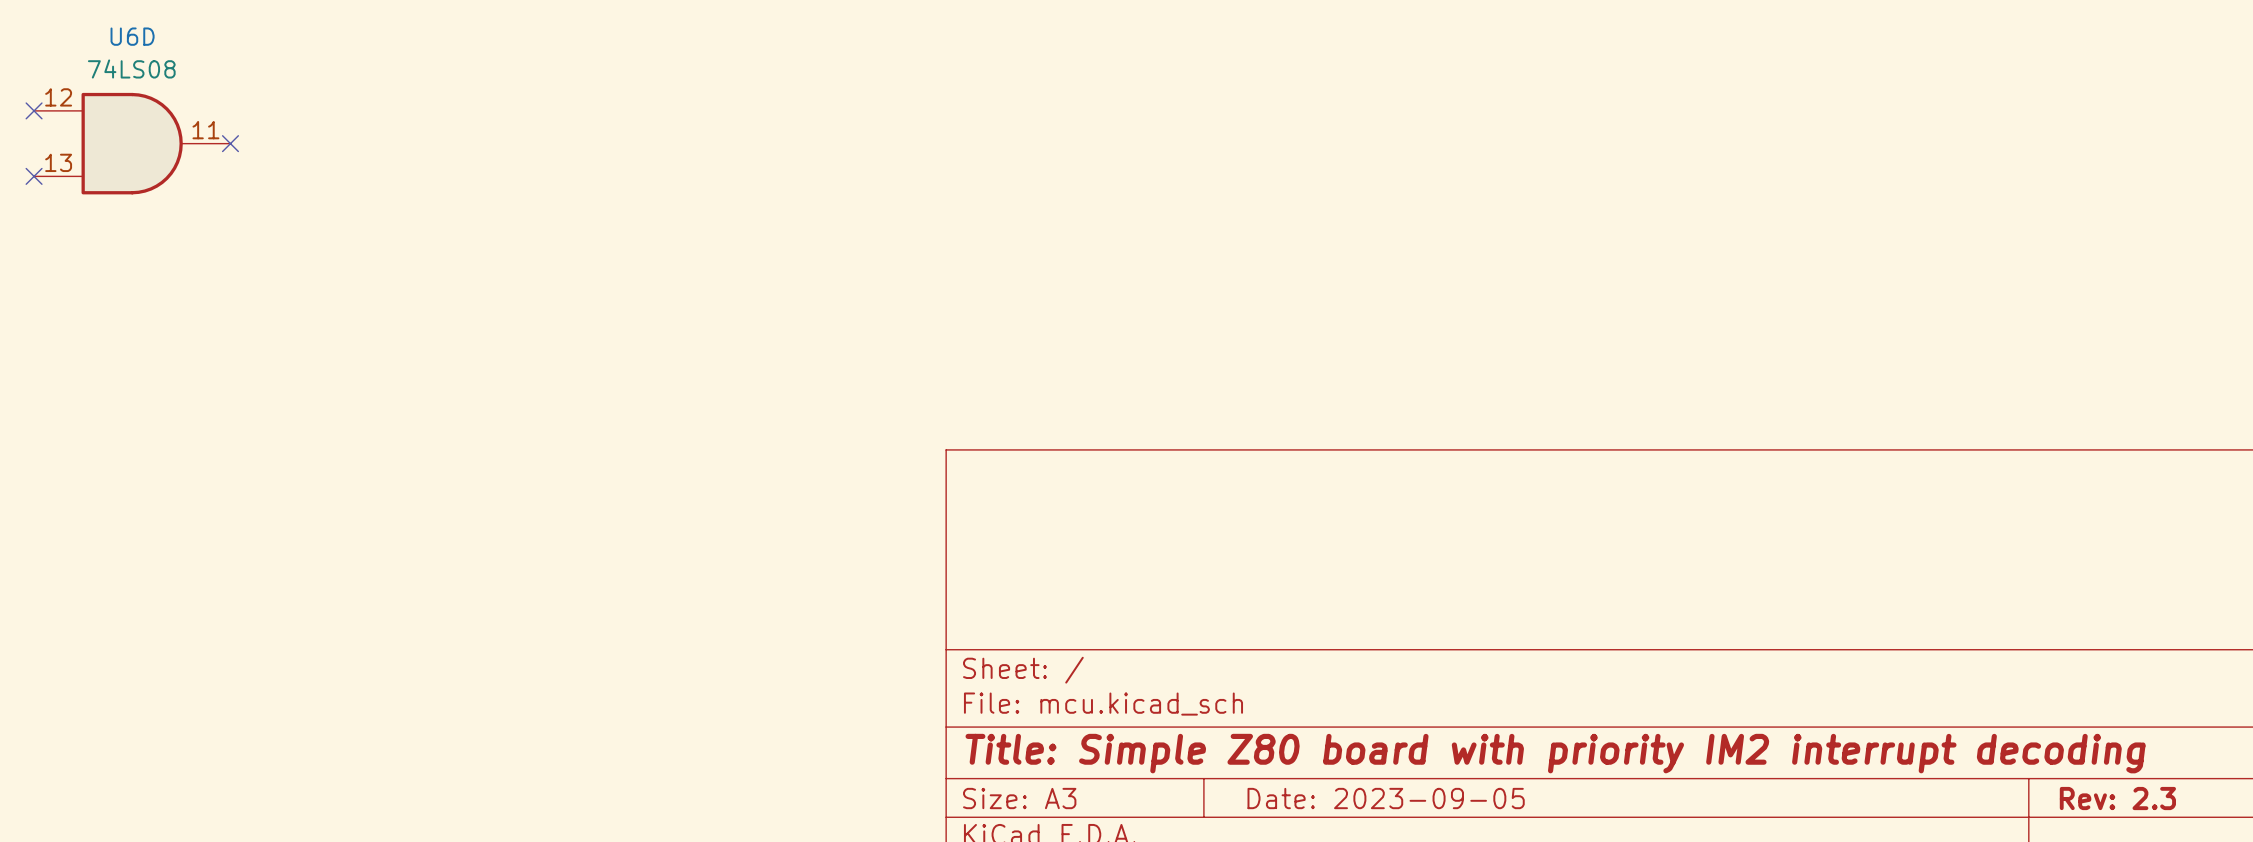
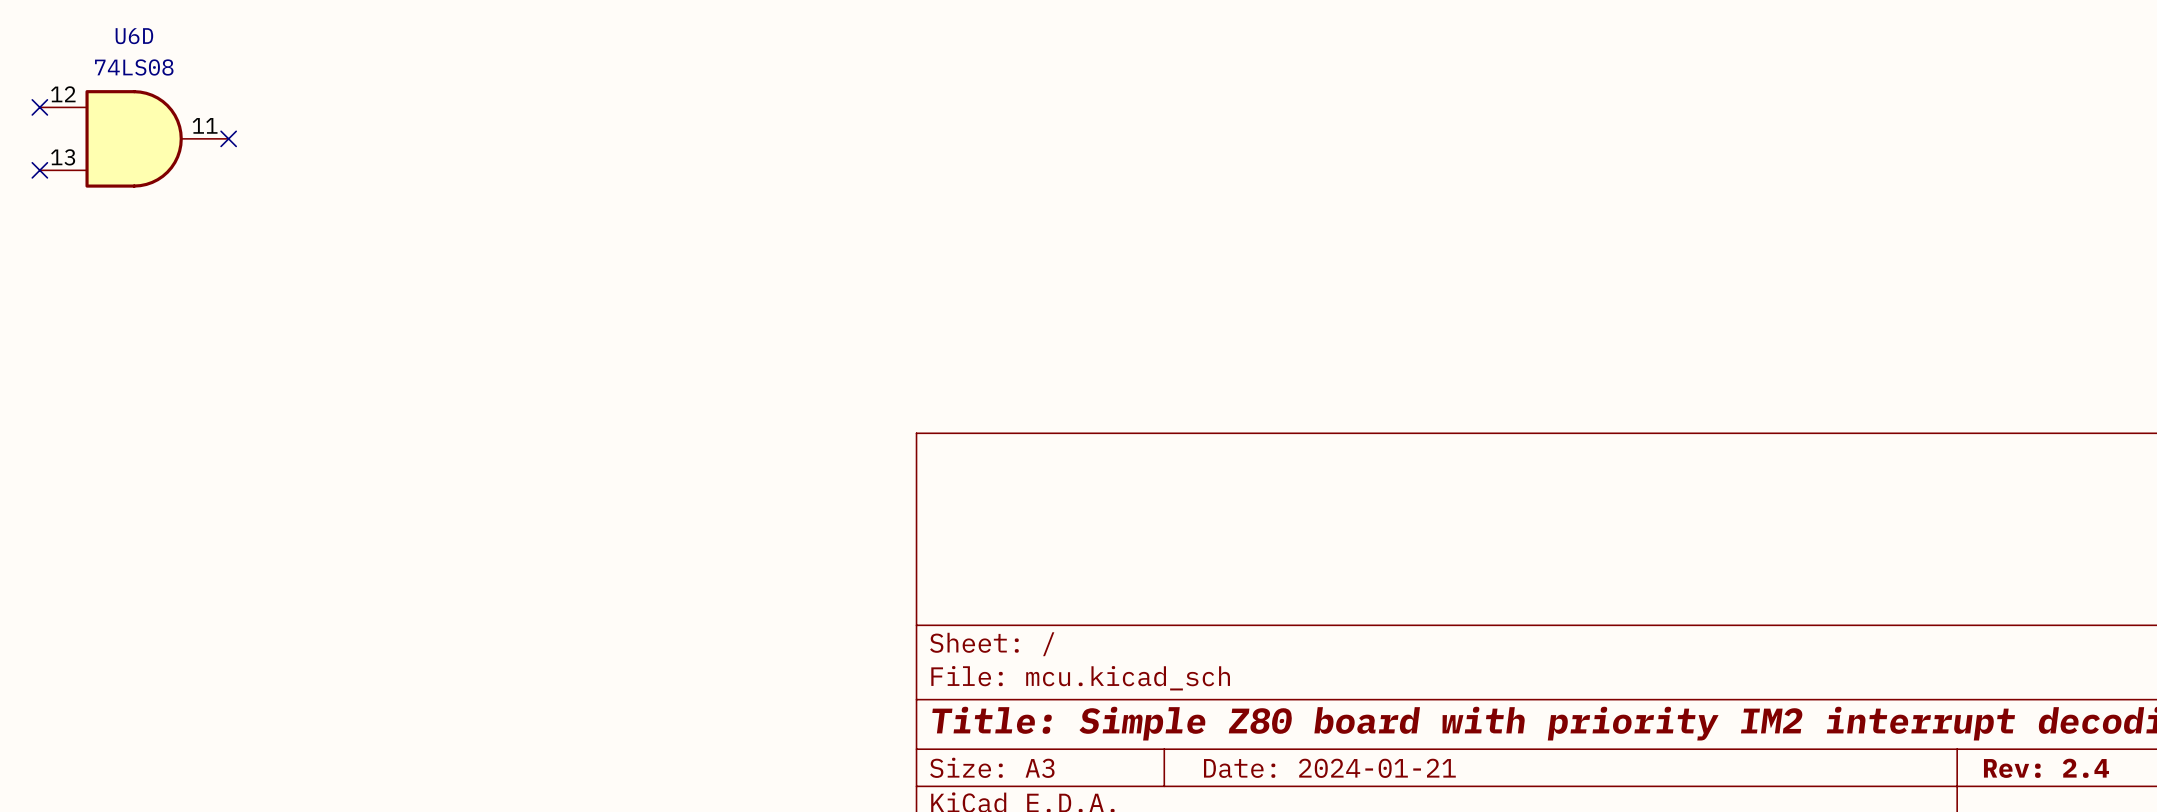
title block: Date: 2023-09-05 (1386, 798) -> Date: 2024-01-21 (1329, 768)
title block: Rev: 2.3 (2117, 798) -> Rev: 2.4 (2046, 768)

